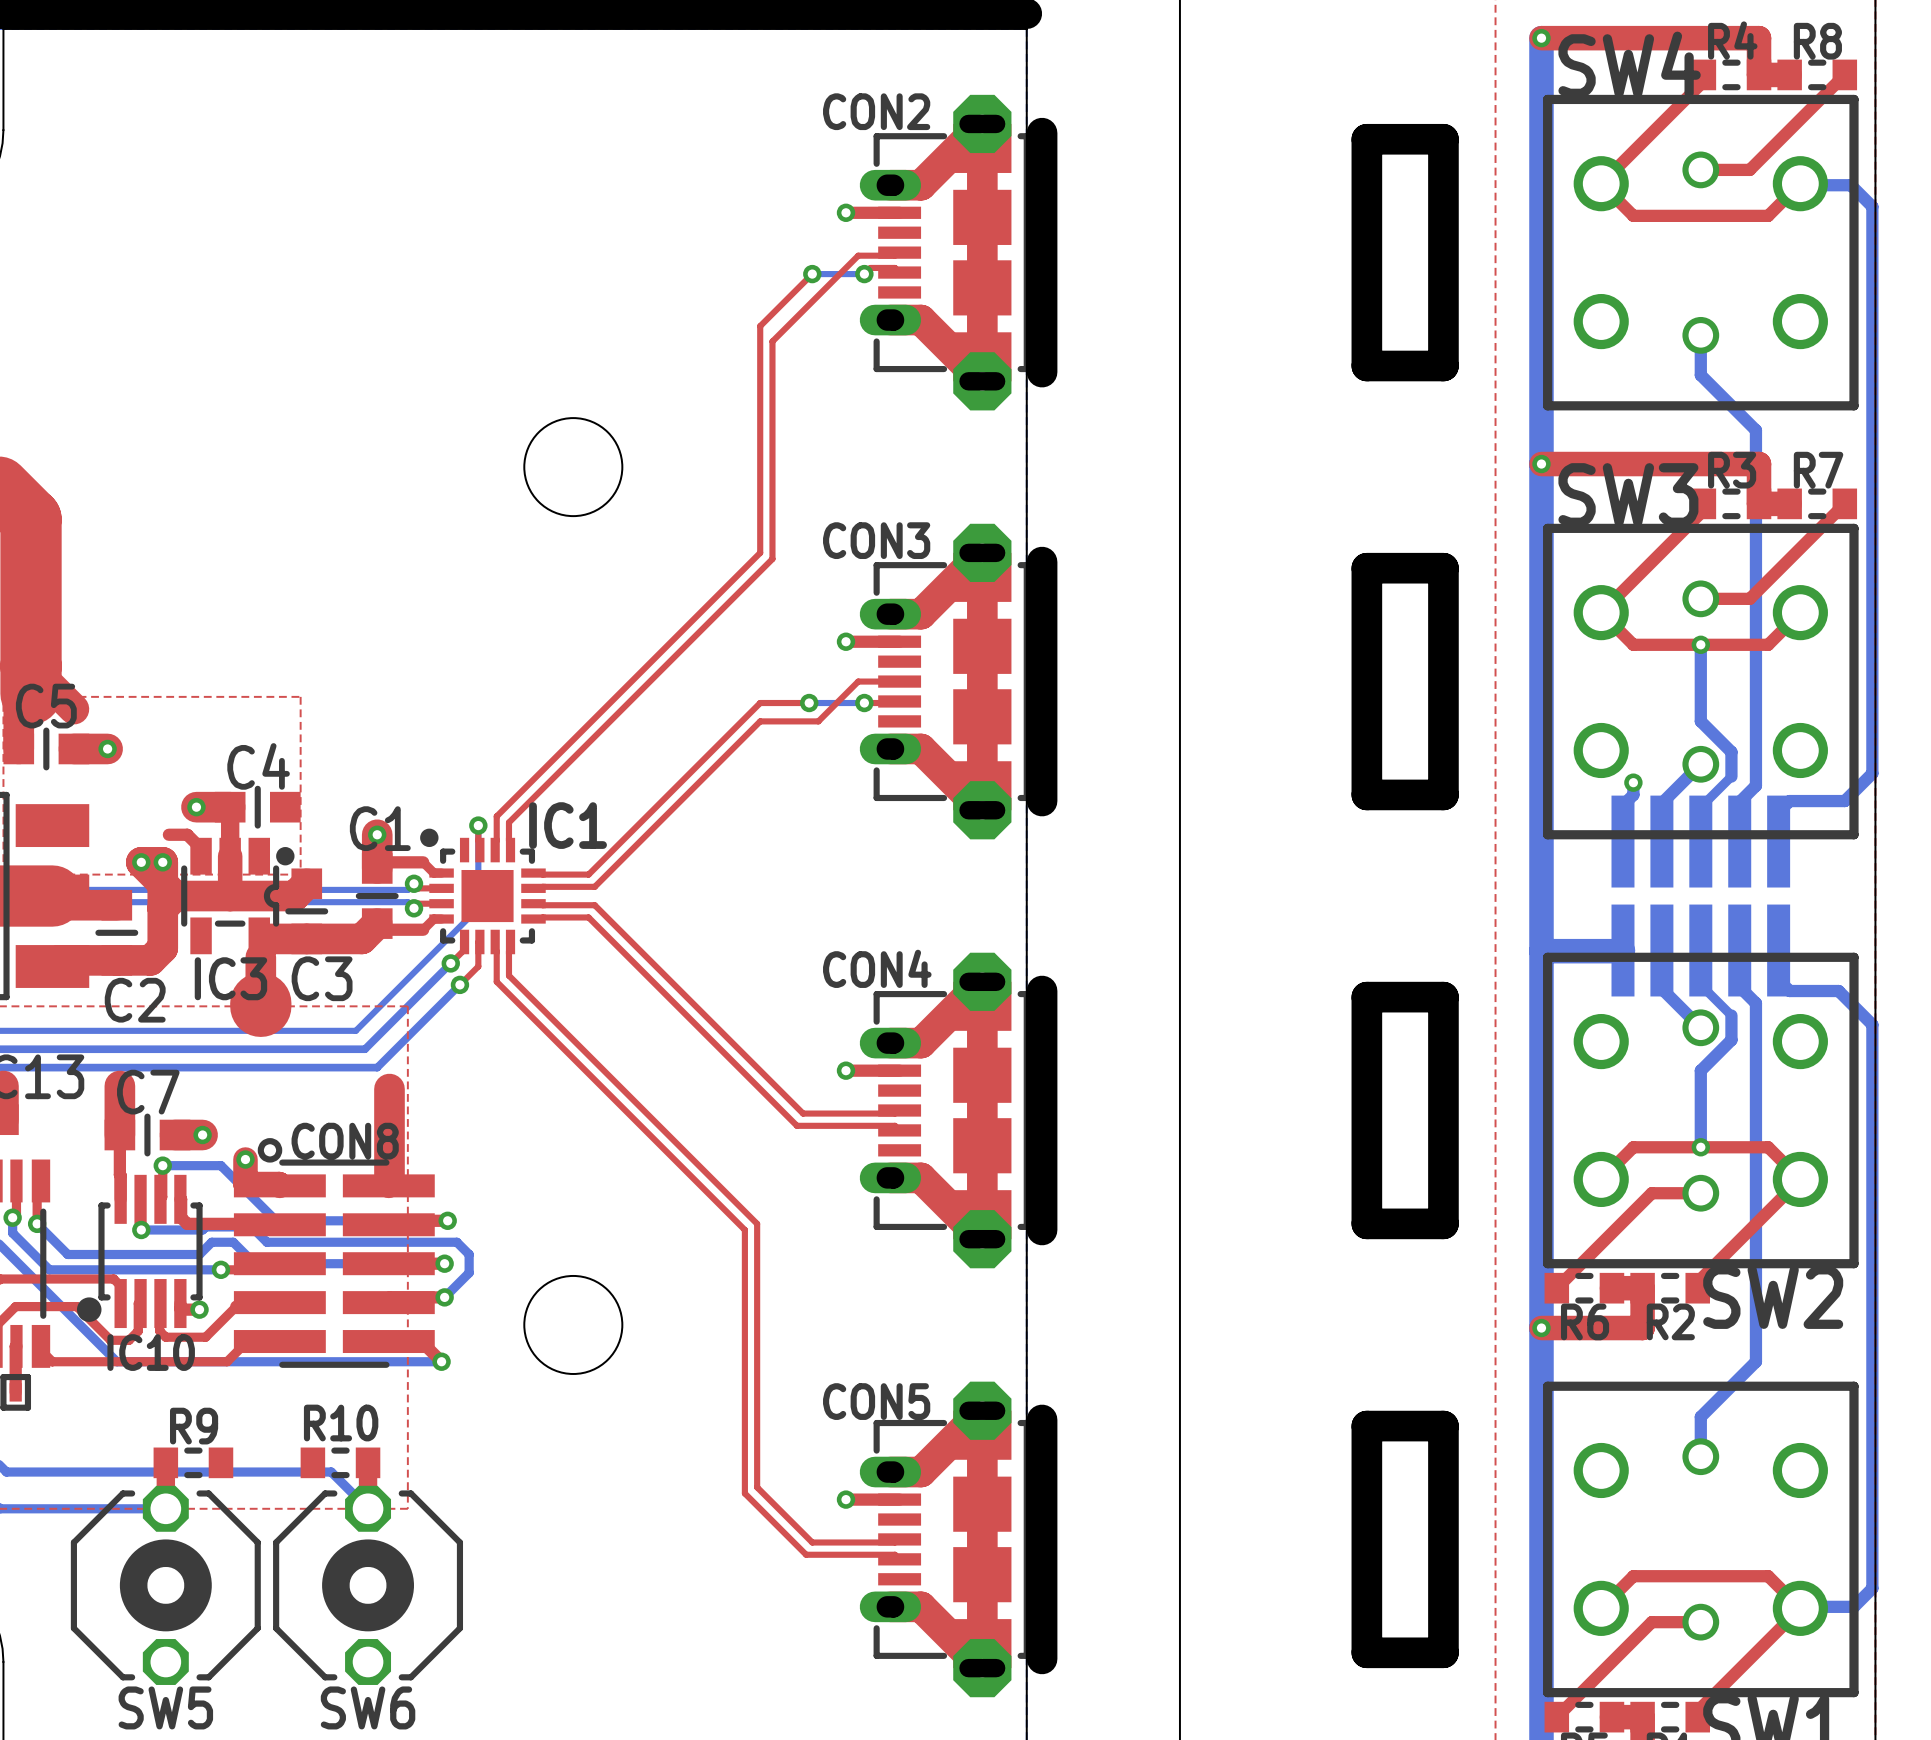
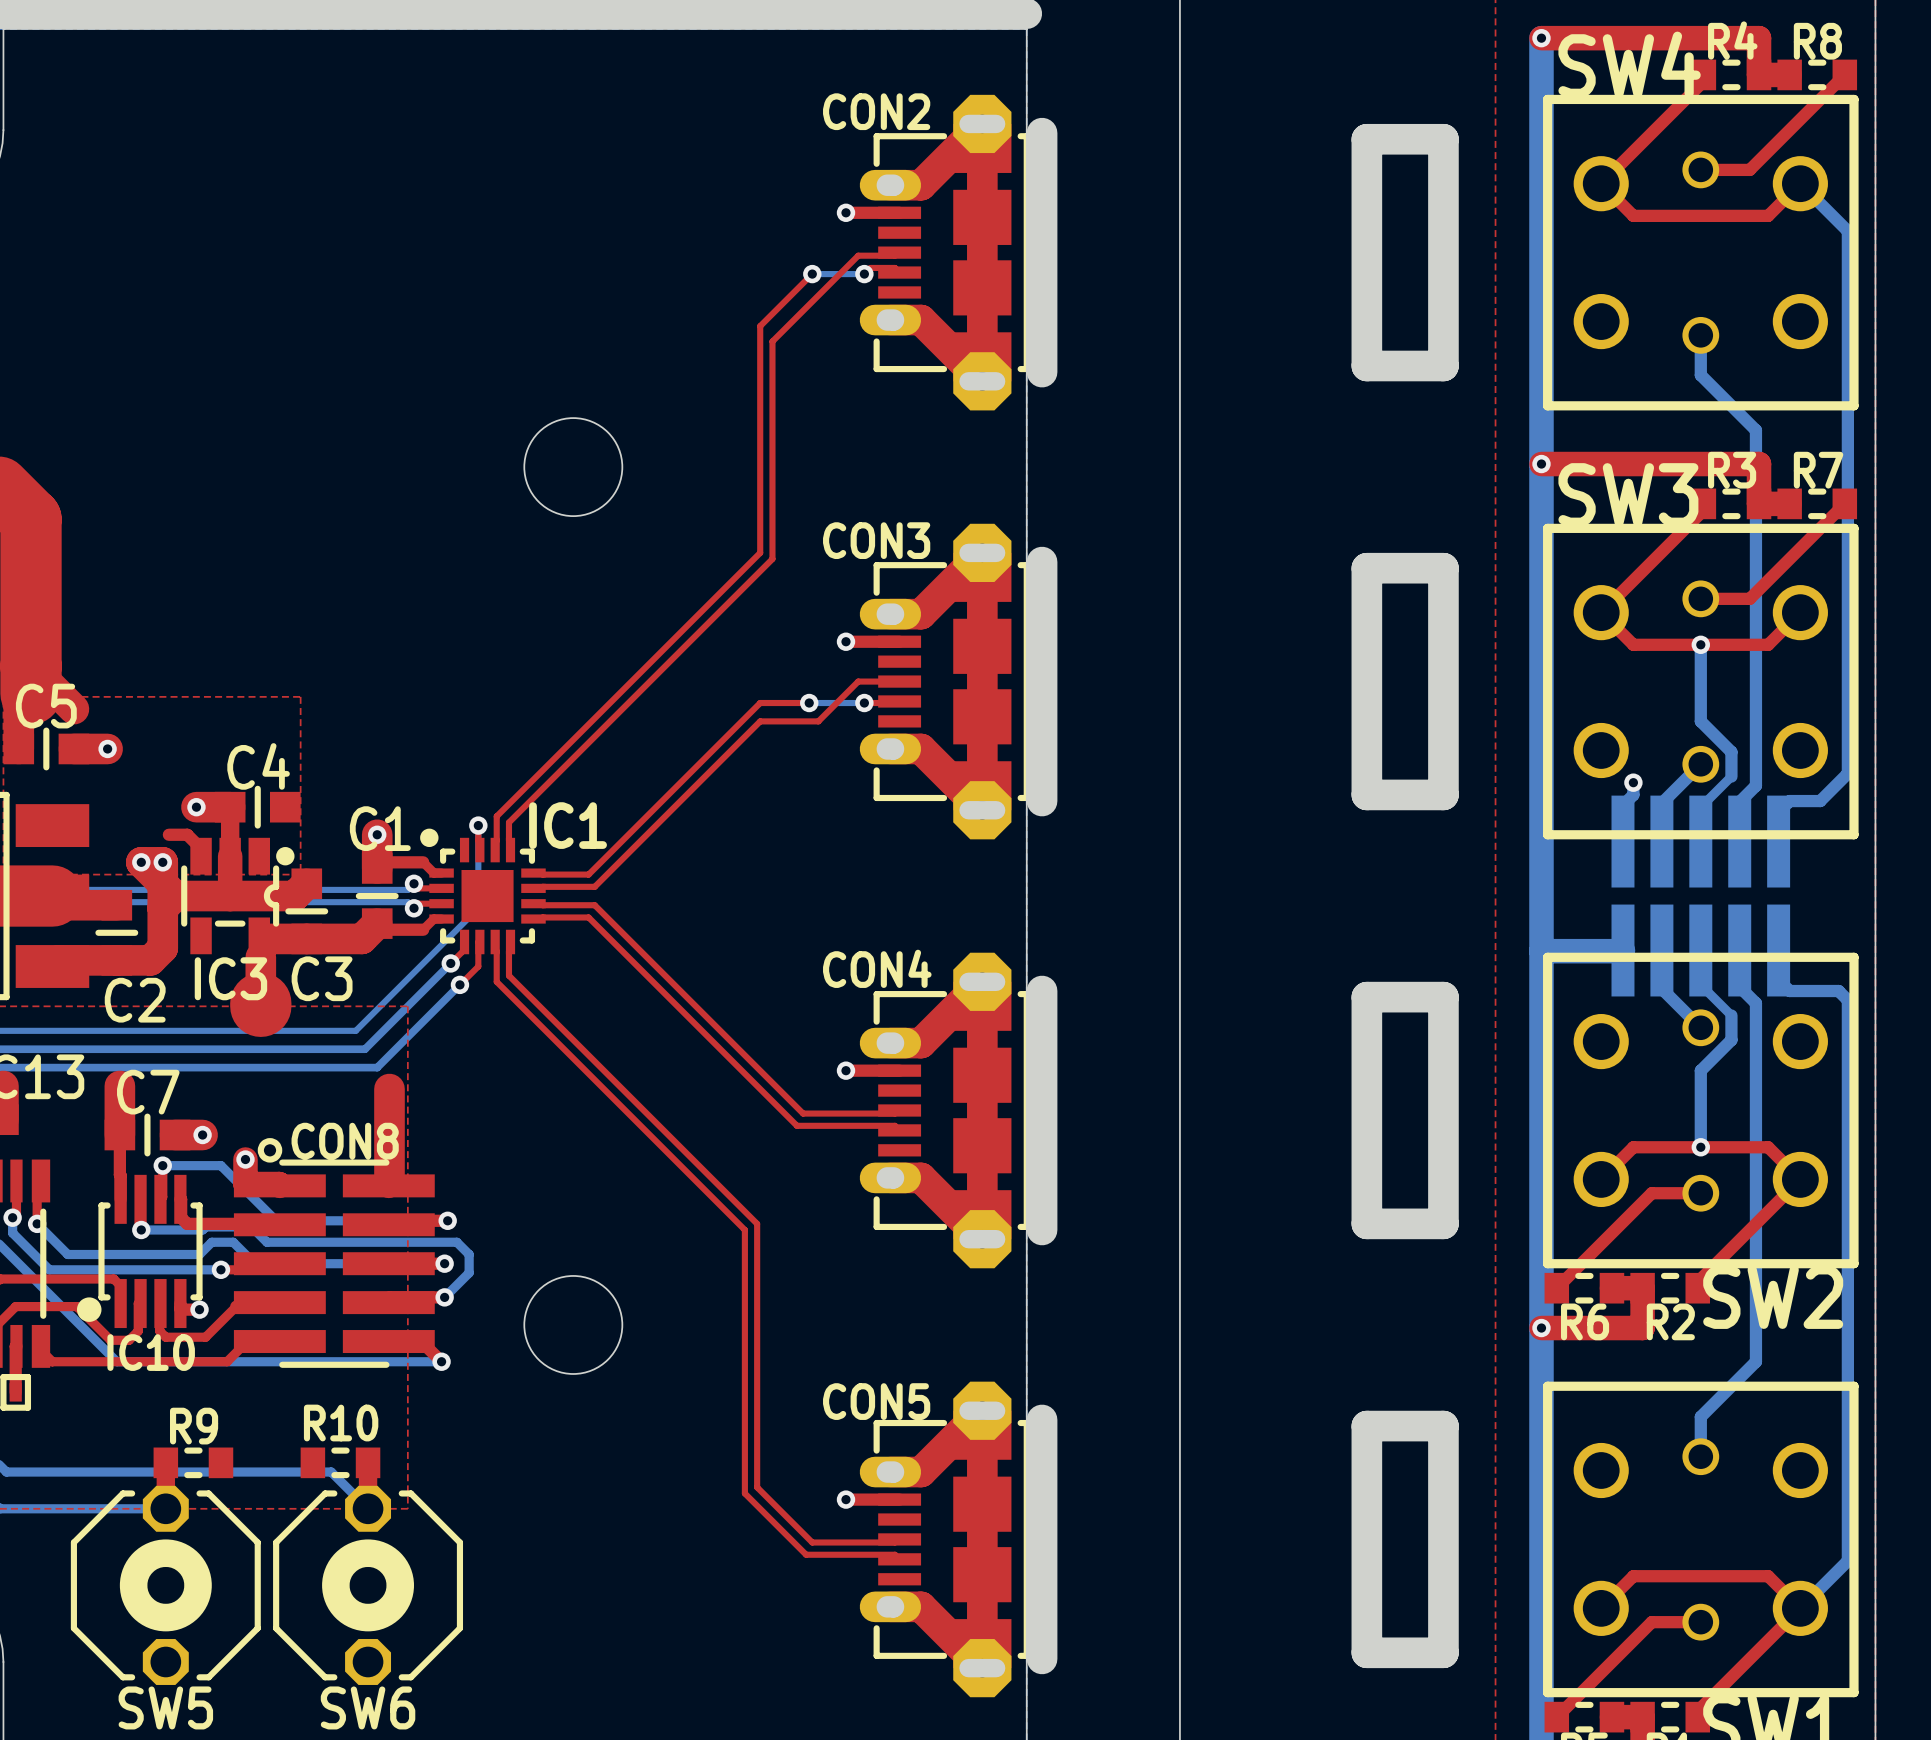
bottom track: (1801, 185) (1850, 185) (1872, 206) (1872, 773) (1844, 801) (1820, 801) -> (1801, 185) (1847, 231) (1847, 773) (1820, 801)
bottom track: (1847, 1000) (1872, 1024) (1872, 1588) (1854, 1606) (1801, 1606) -> (1847, 1000) (1847, 1560) (1801, 1606)

